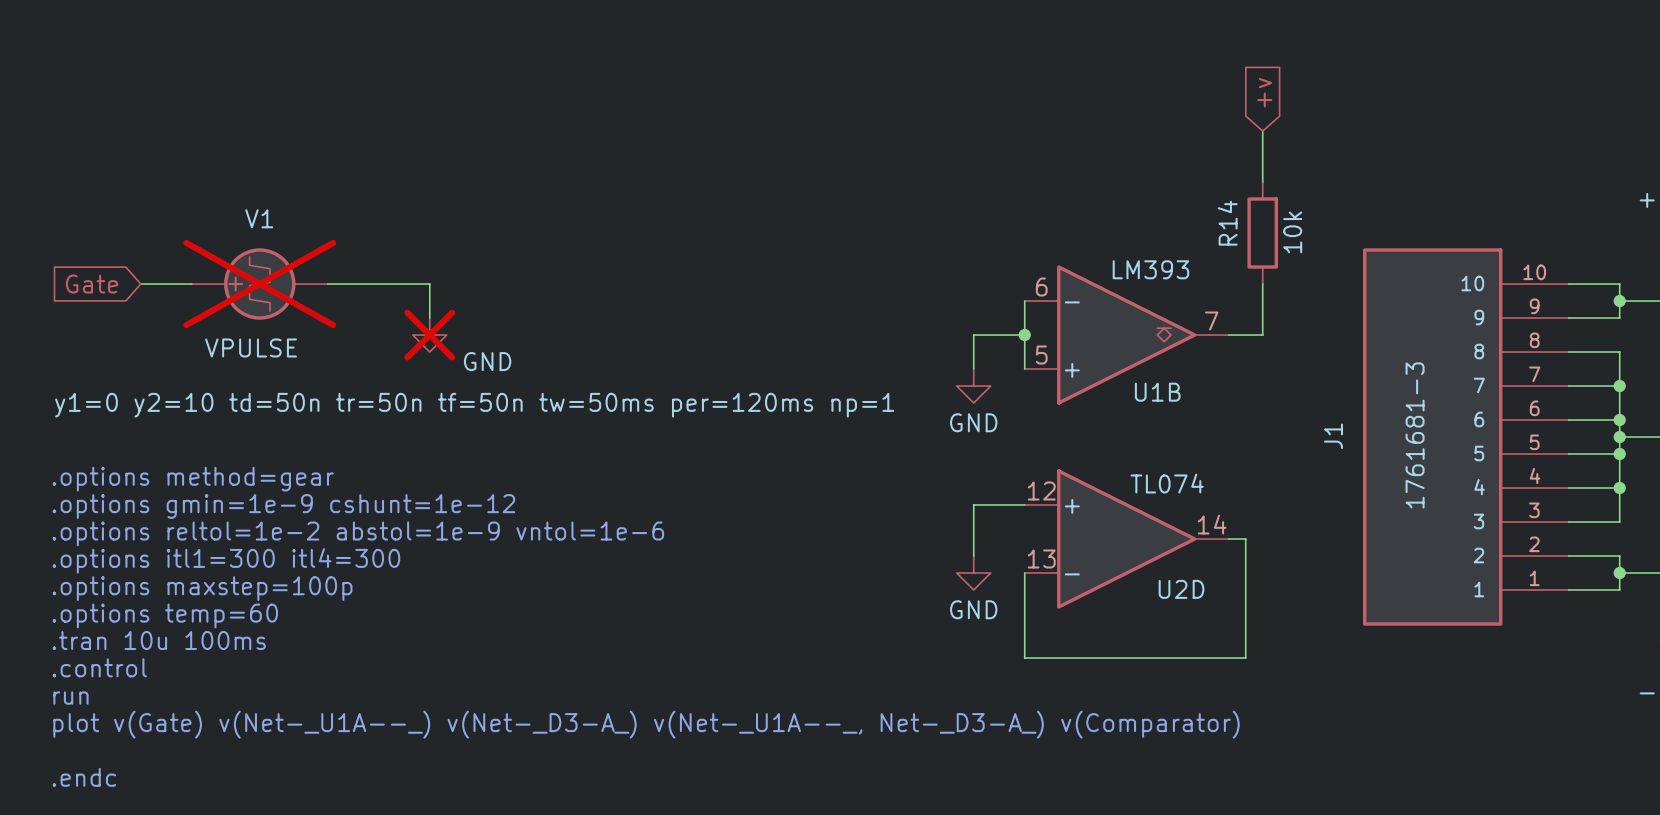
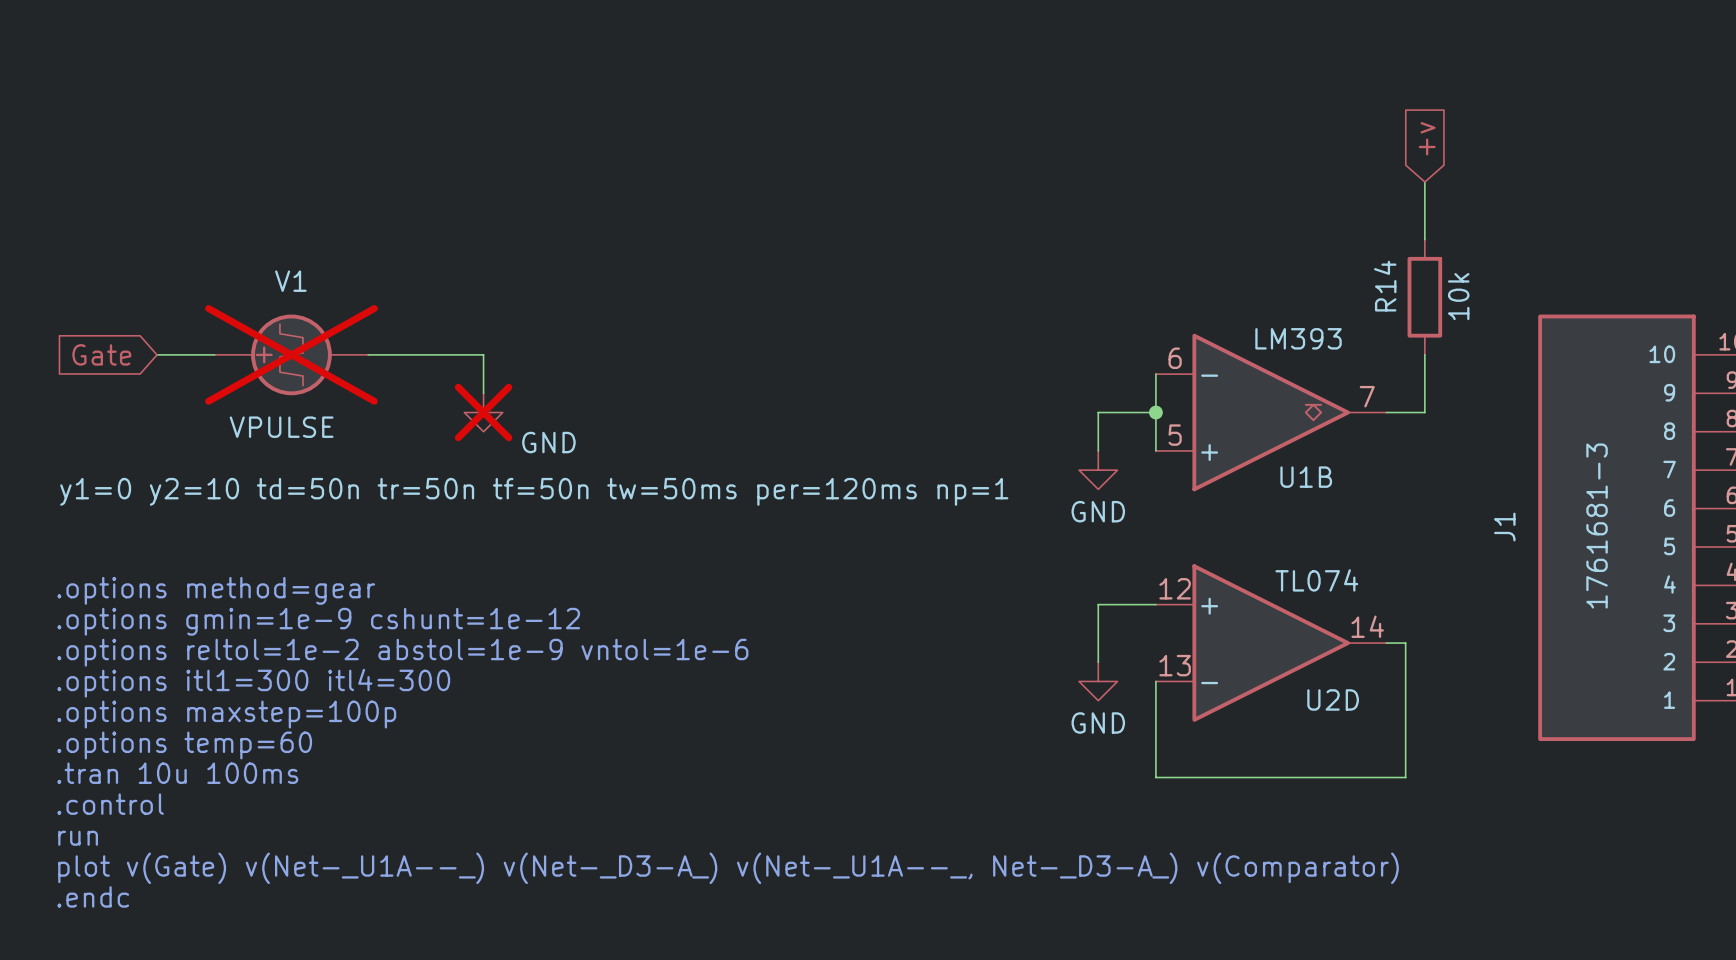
text position: .options method=gear (193, 479) -> .options method=gear (216, 590)
text position: .options gmin=1e-9 cshunt=1e-12 (283, 506) -> .options gmin=1e-9 cshunt=1e-12 (318, 621)
text position: .options reltol=1e-2 abstol=1e-9 vntol=1e-6 (358, 533) -> .options reltol=1e-2 abstol=1e-9 vntol=1e-6 (402, 652)
text position: .options itl1=300 itl4=300 (226, 560) -> .options itl1=300 itl4=300 (253, 683)
text position: .options maxstep=100p (202, 588) -> .options maxstep=100p (226, 714)
text position: .options temp=60 (165, 615) -> .options temp=60 (184, 745)
text position: .tran 10u 100ms (159, 640) -> .tran 10u 100ms (177, 773)
text position: .control (99, 667) -> .control (110, 804)
text position: run (70, 698) -> run (78, 838)
text position: plot v(Gate) v(Net-_U1A--_) v(Net-_D3-A_) v(Net-_U1A--_, Net-_D3-A_) v(Comparator) (646, 724) -> plot v(Gate) v(Net-_U1A--_) v(Net-_D3-A_) v(Net-_U1A--_, Net-_D3-A_) v(Comparator) (728, 868)
text position: .endc (84, 777) -> .endc (93, 896)

